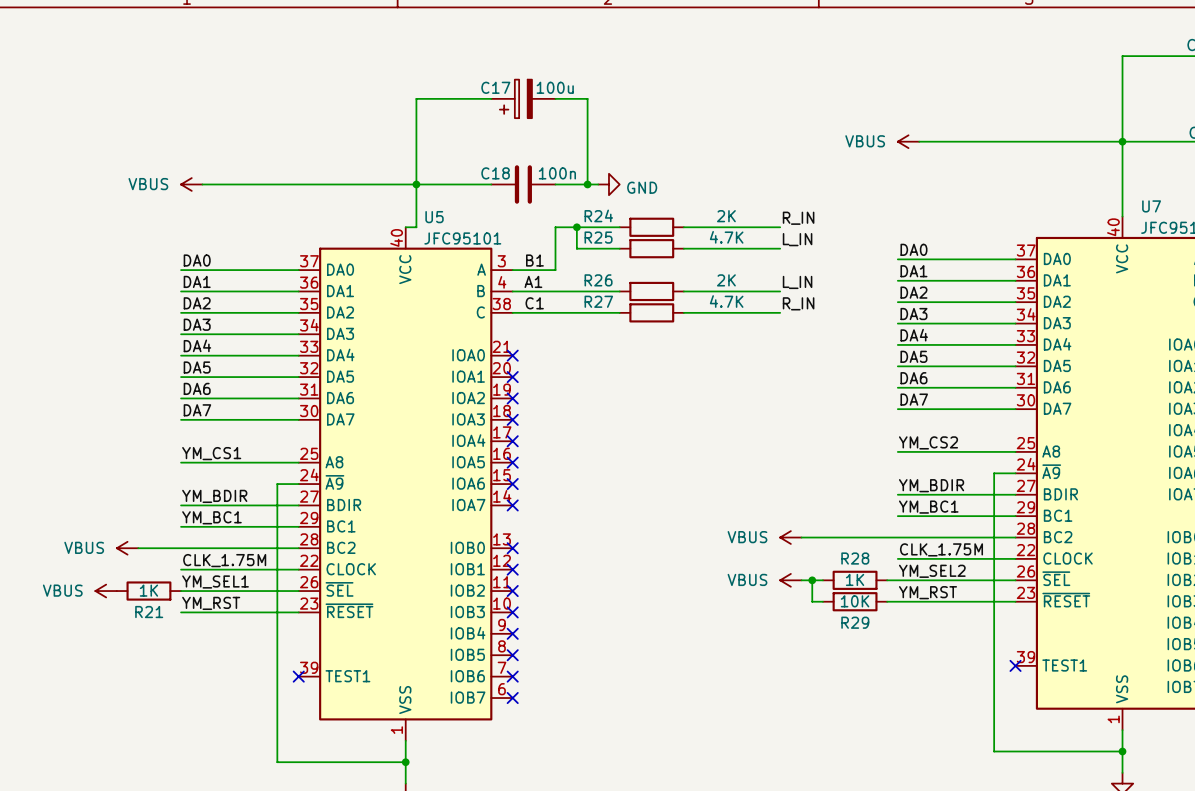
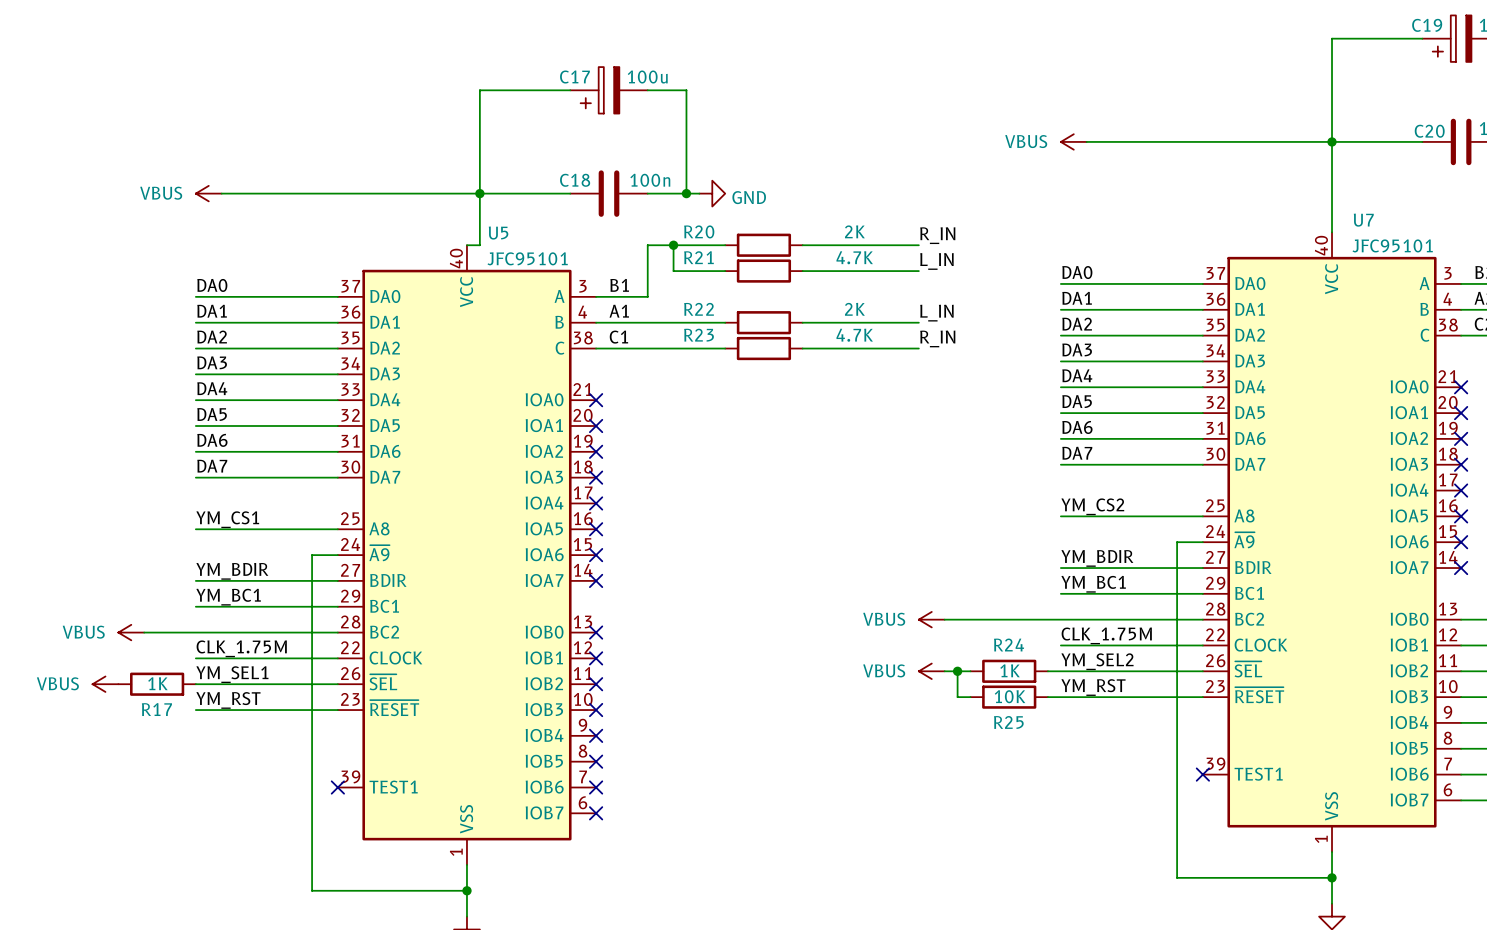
R24 name: R24 (598, 215) -> R20 (699, 231)
R25 name: R25 (598, 237) -> R21 (698, 257)
R26 name: R26 (598, 280) -> R22 (699, 309)
R27 name: R27 (598, 301) -> R23 (699, 335)
R28 name: R28 (855, 558) -> R24 (1009, 644)
R21 name: R21 (149, 612) -> R17 (156, 709)
R29 name: R29 (855, 622) -> R25 (1008, 722)

